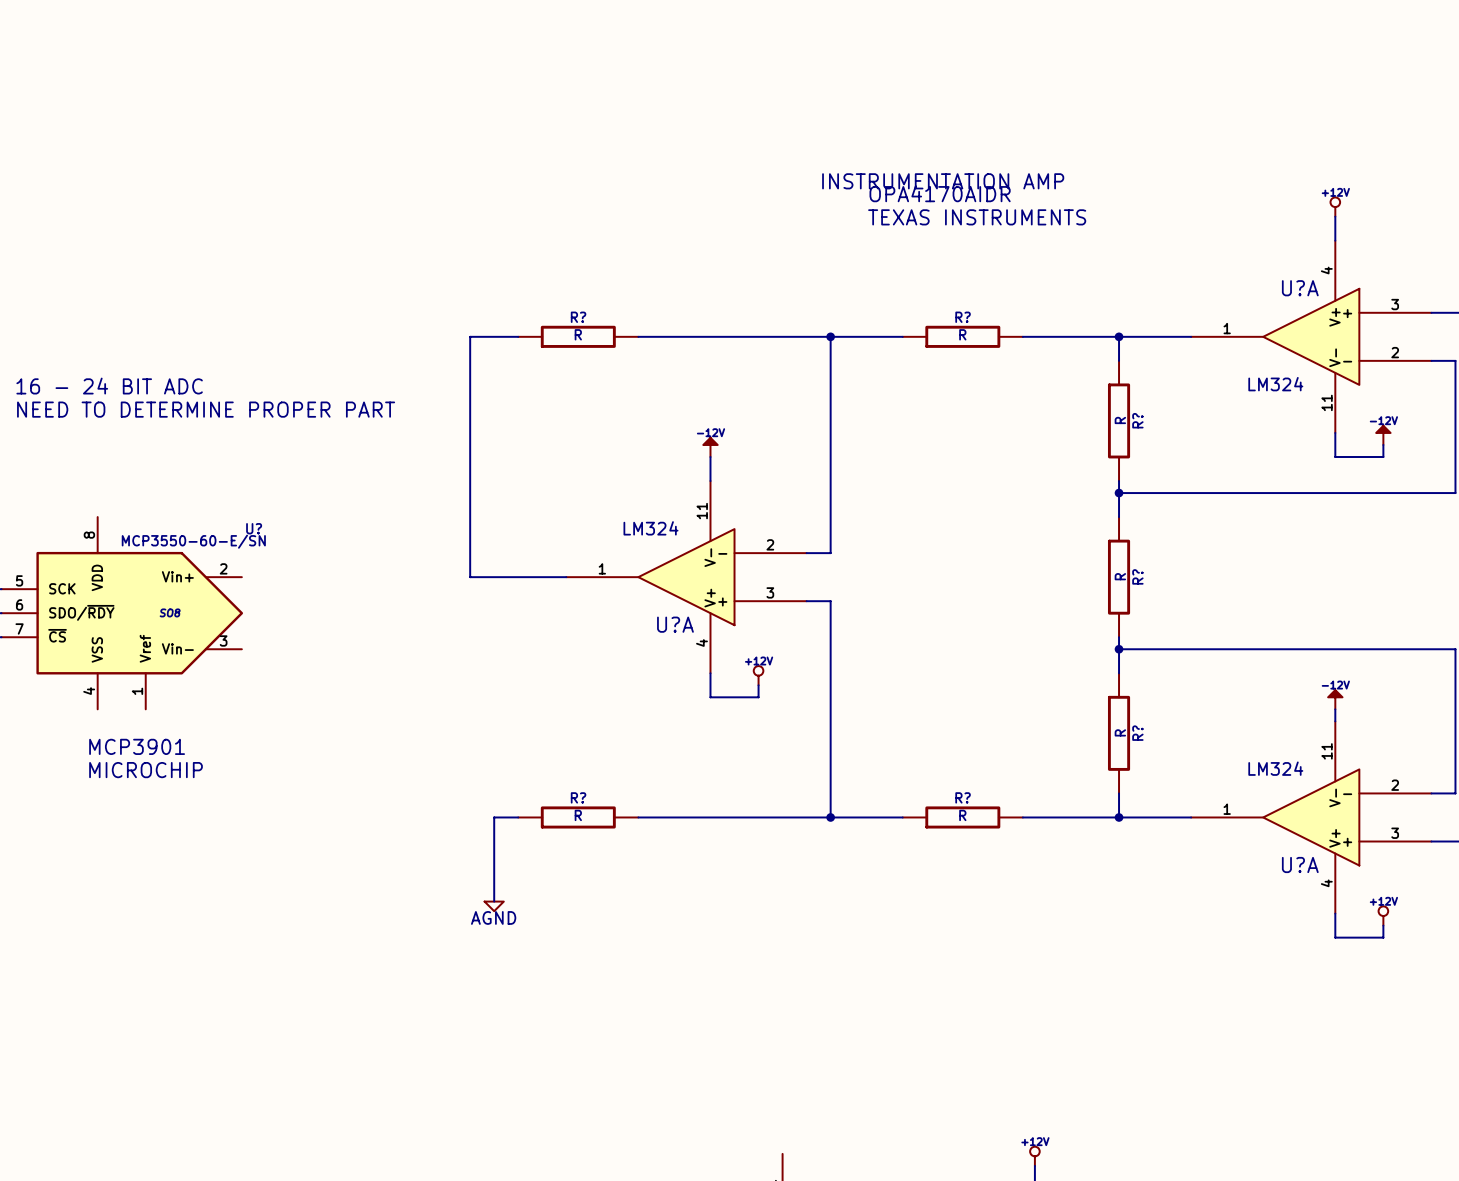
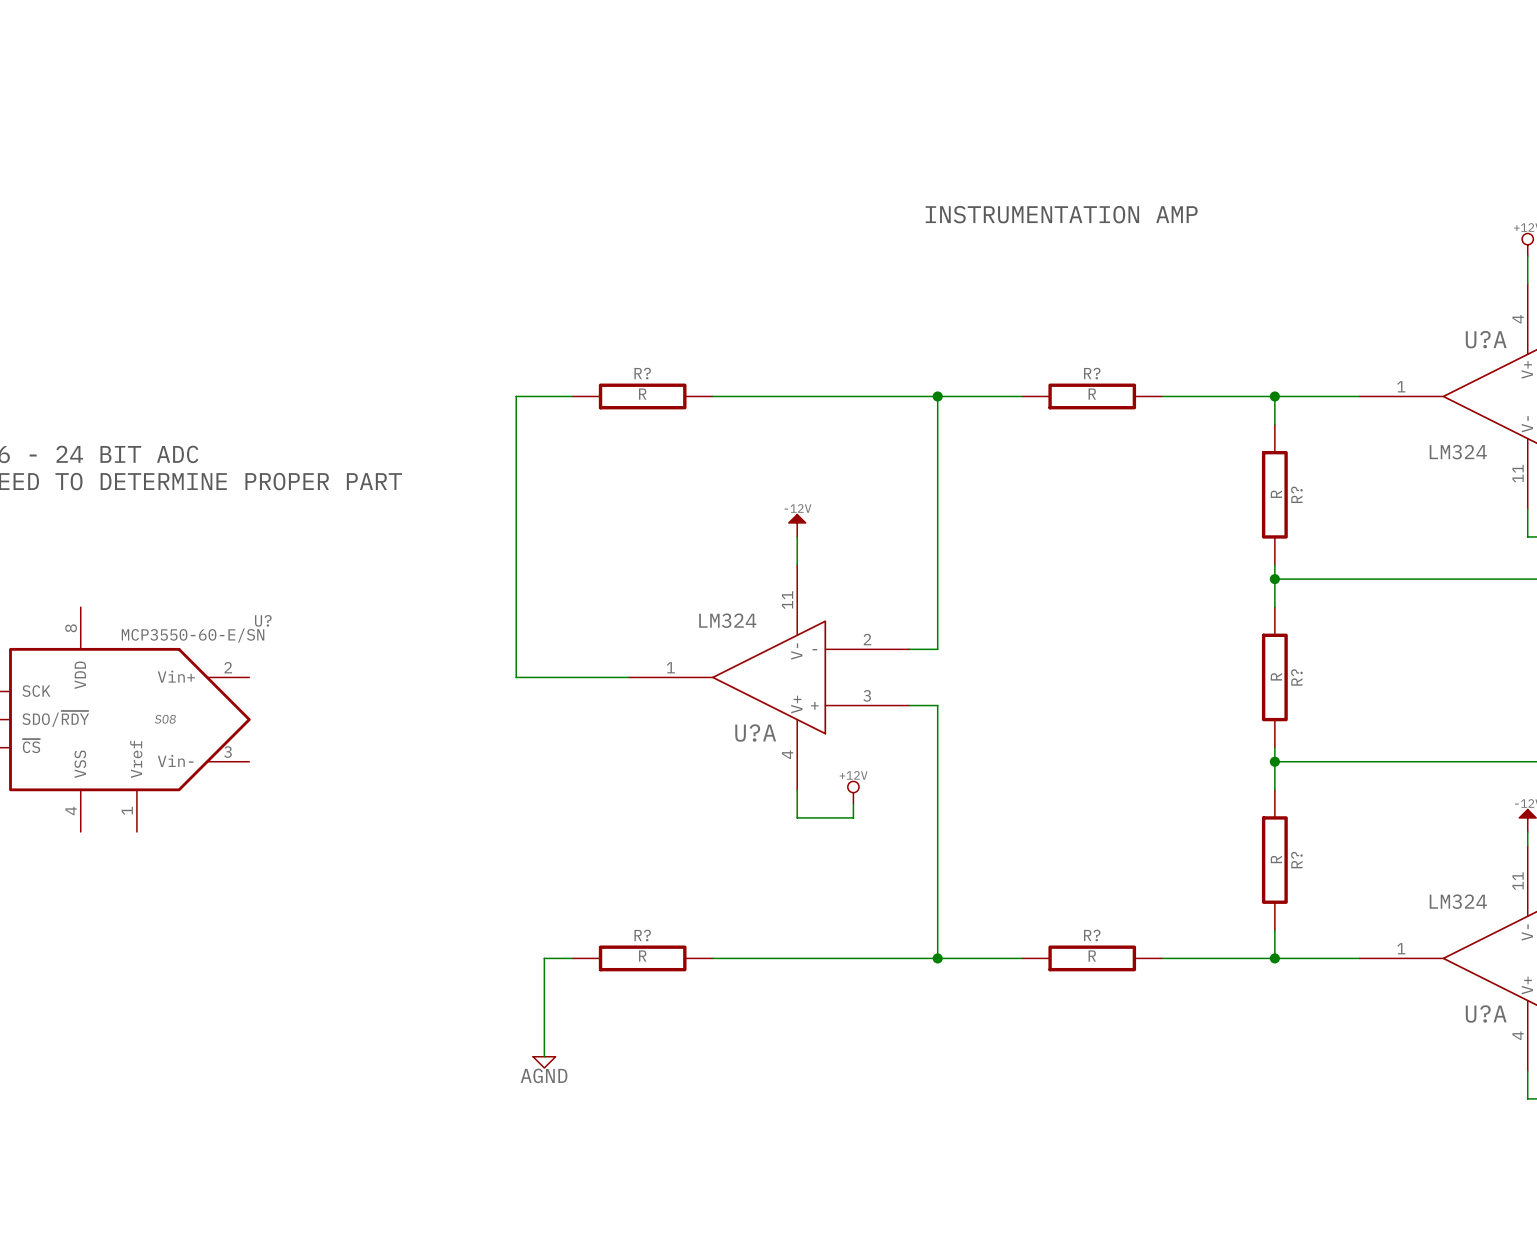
text: OPA4170AIDR (940, 193) -> none
text: TEXAS INSTRUMENTS (977, 217) -> none
text: MCP3901 (137, 746) -> none
text: MICROCHIP (146, 770) -> none

